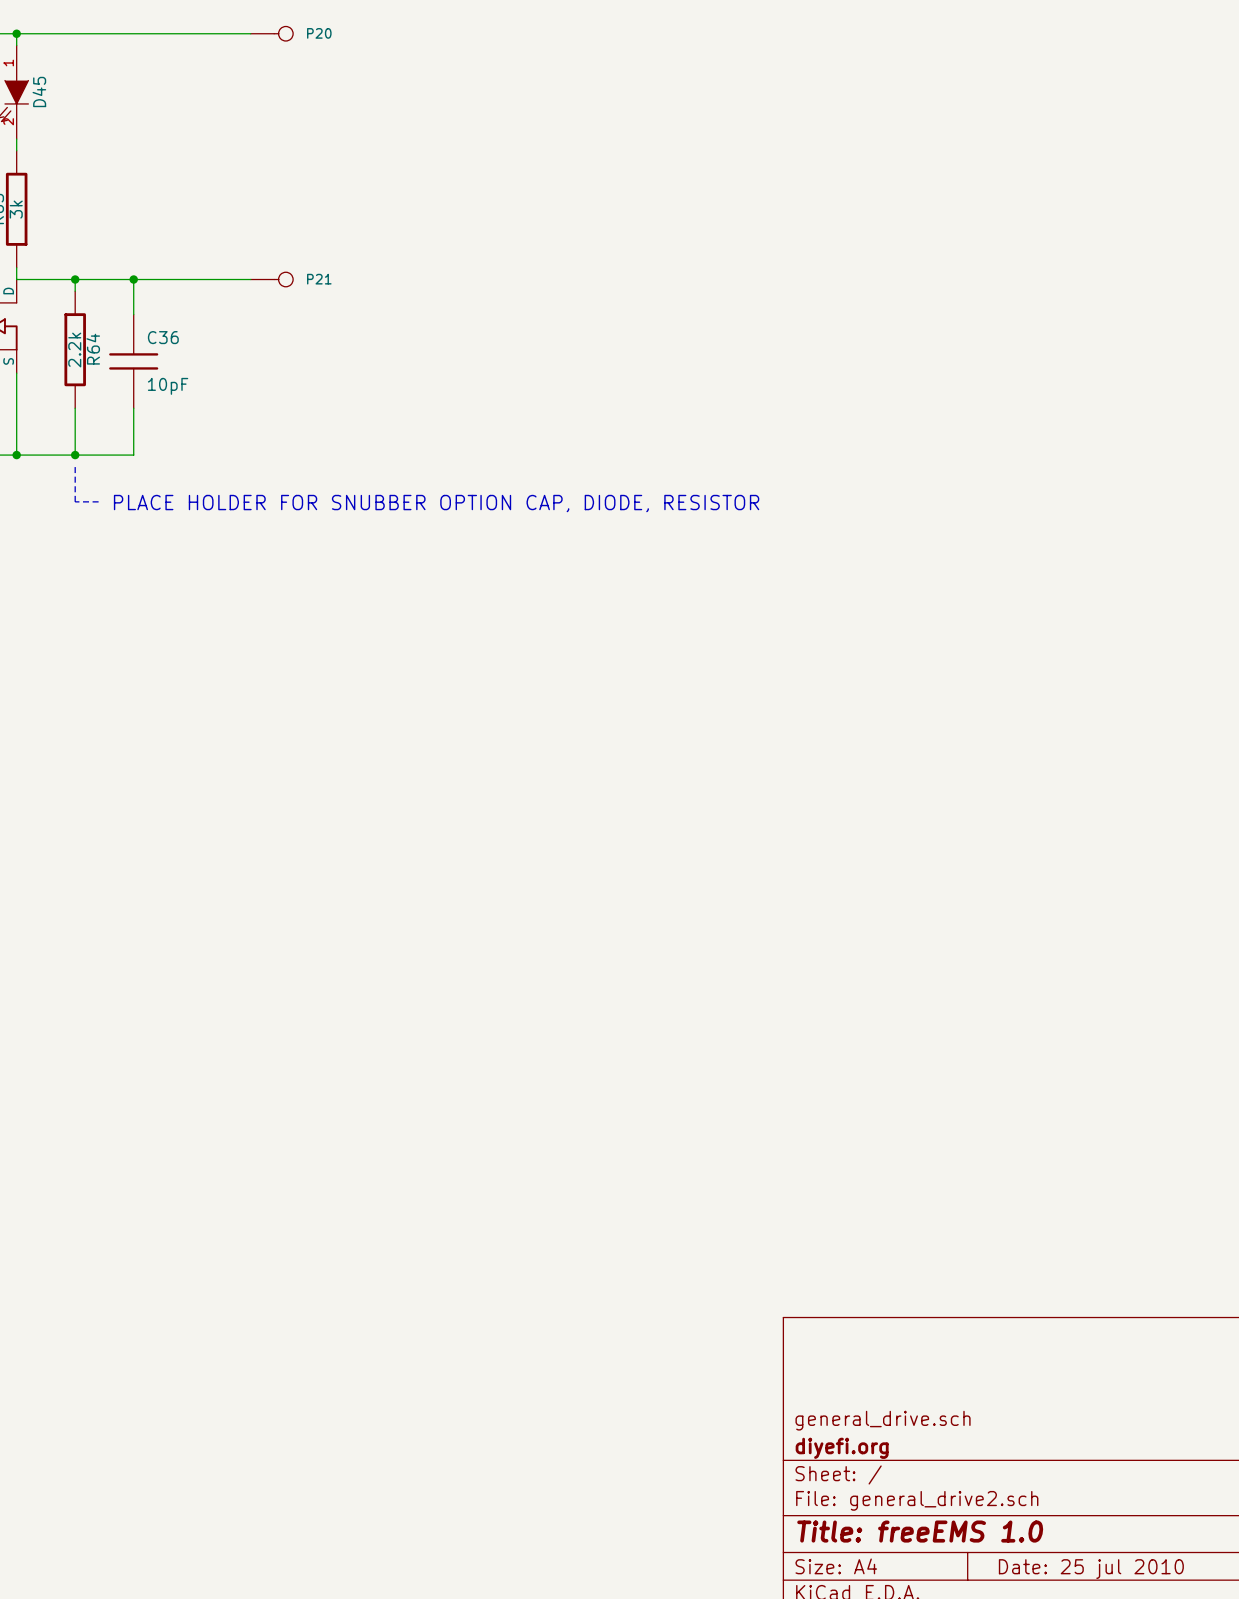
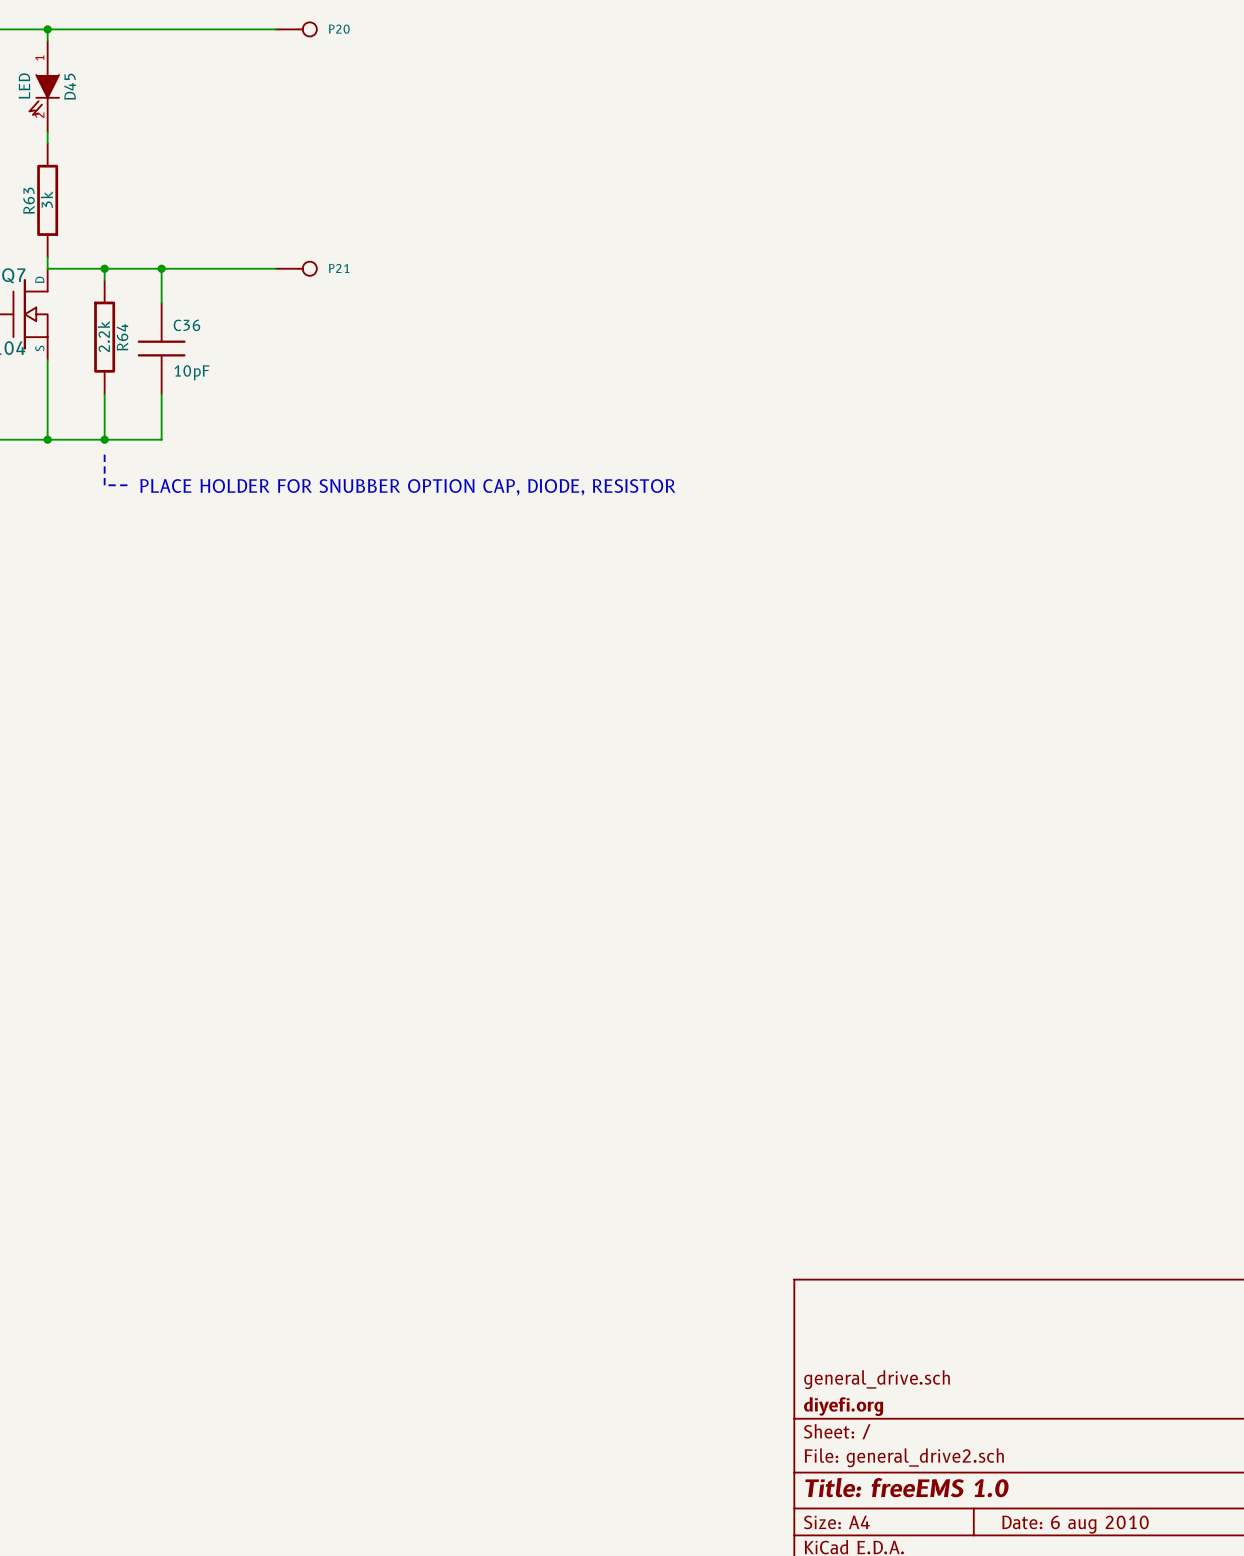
title block: Date: 25 jul 2010 (1091, 1569) -> Date: 6 aug 2010 (1075, 1524)

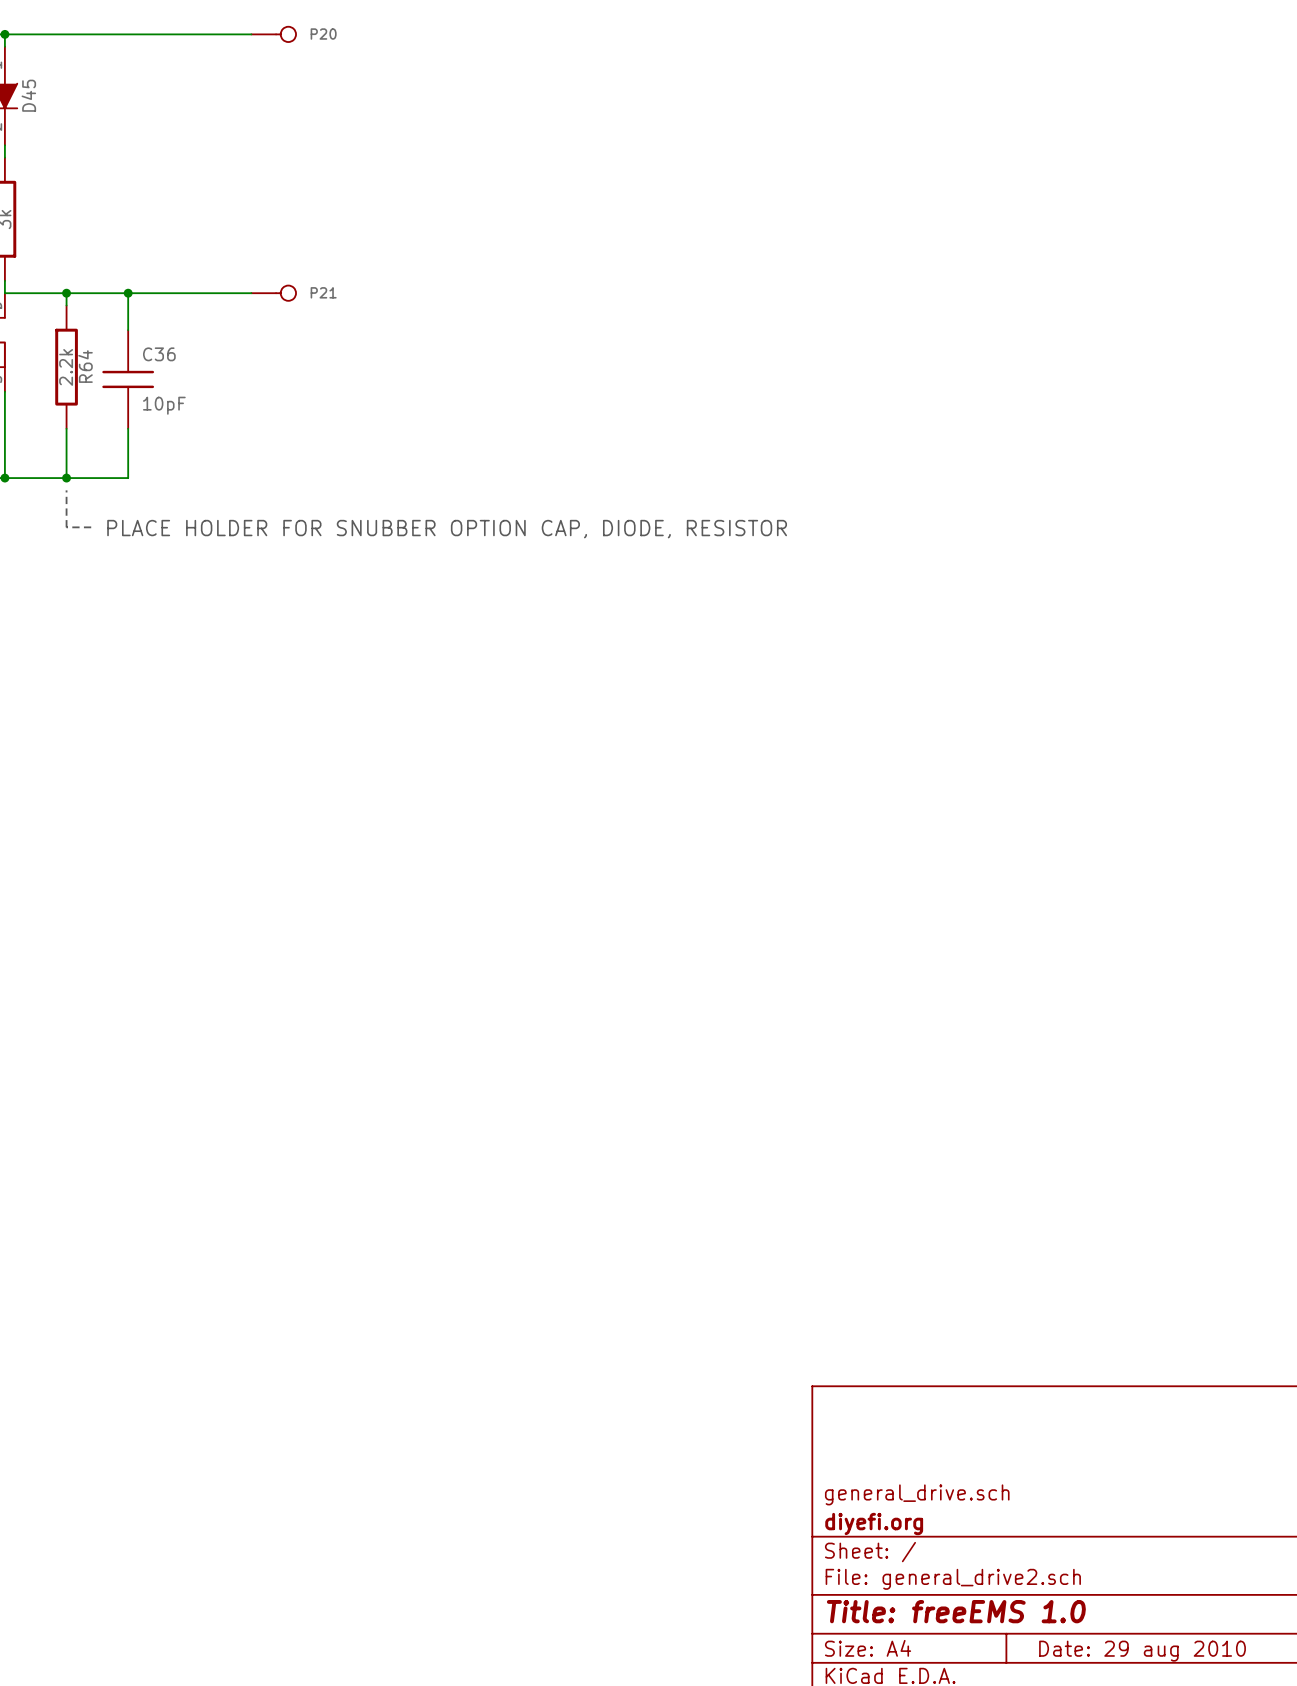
title block: Date: 6 aug 2010 (1075, 1524) -> Date: 29 aug 2010 (1142, 1651)

